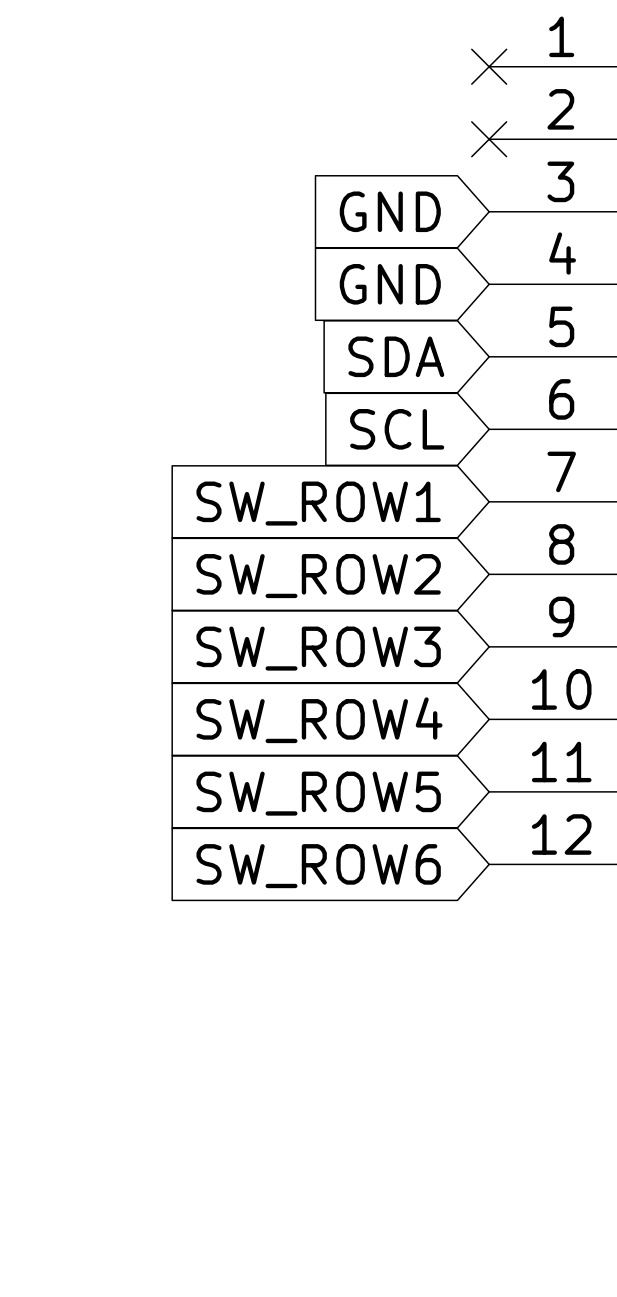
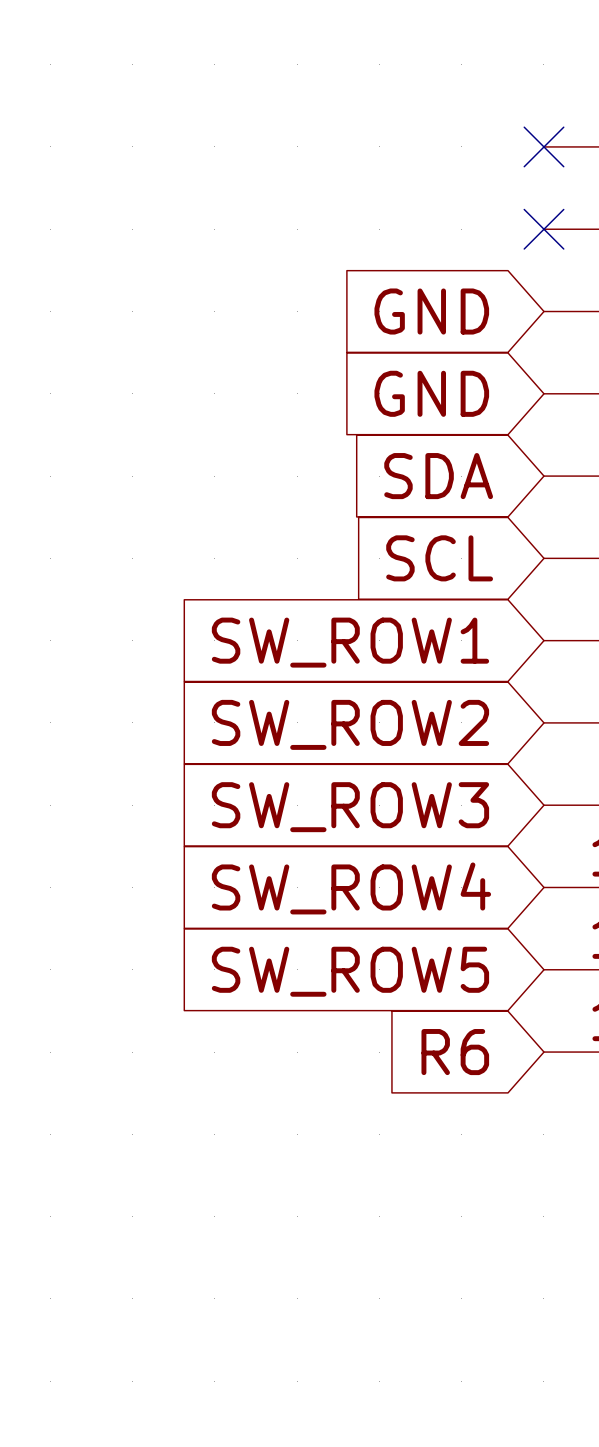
global label: SW_ROW6 (318, 866) -> R6 (455, 1052)

